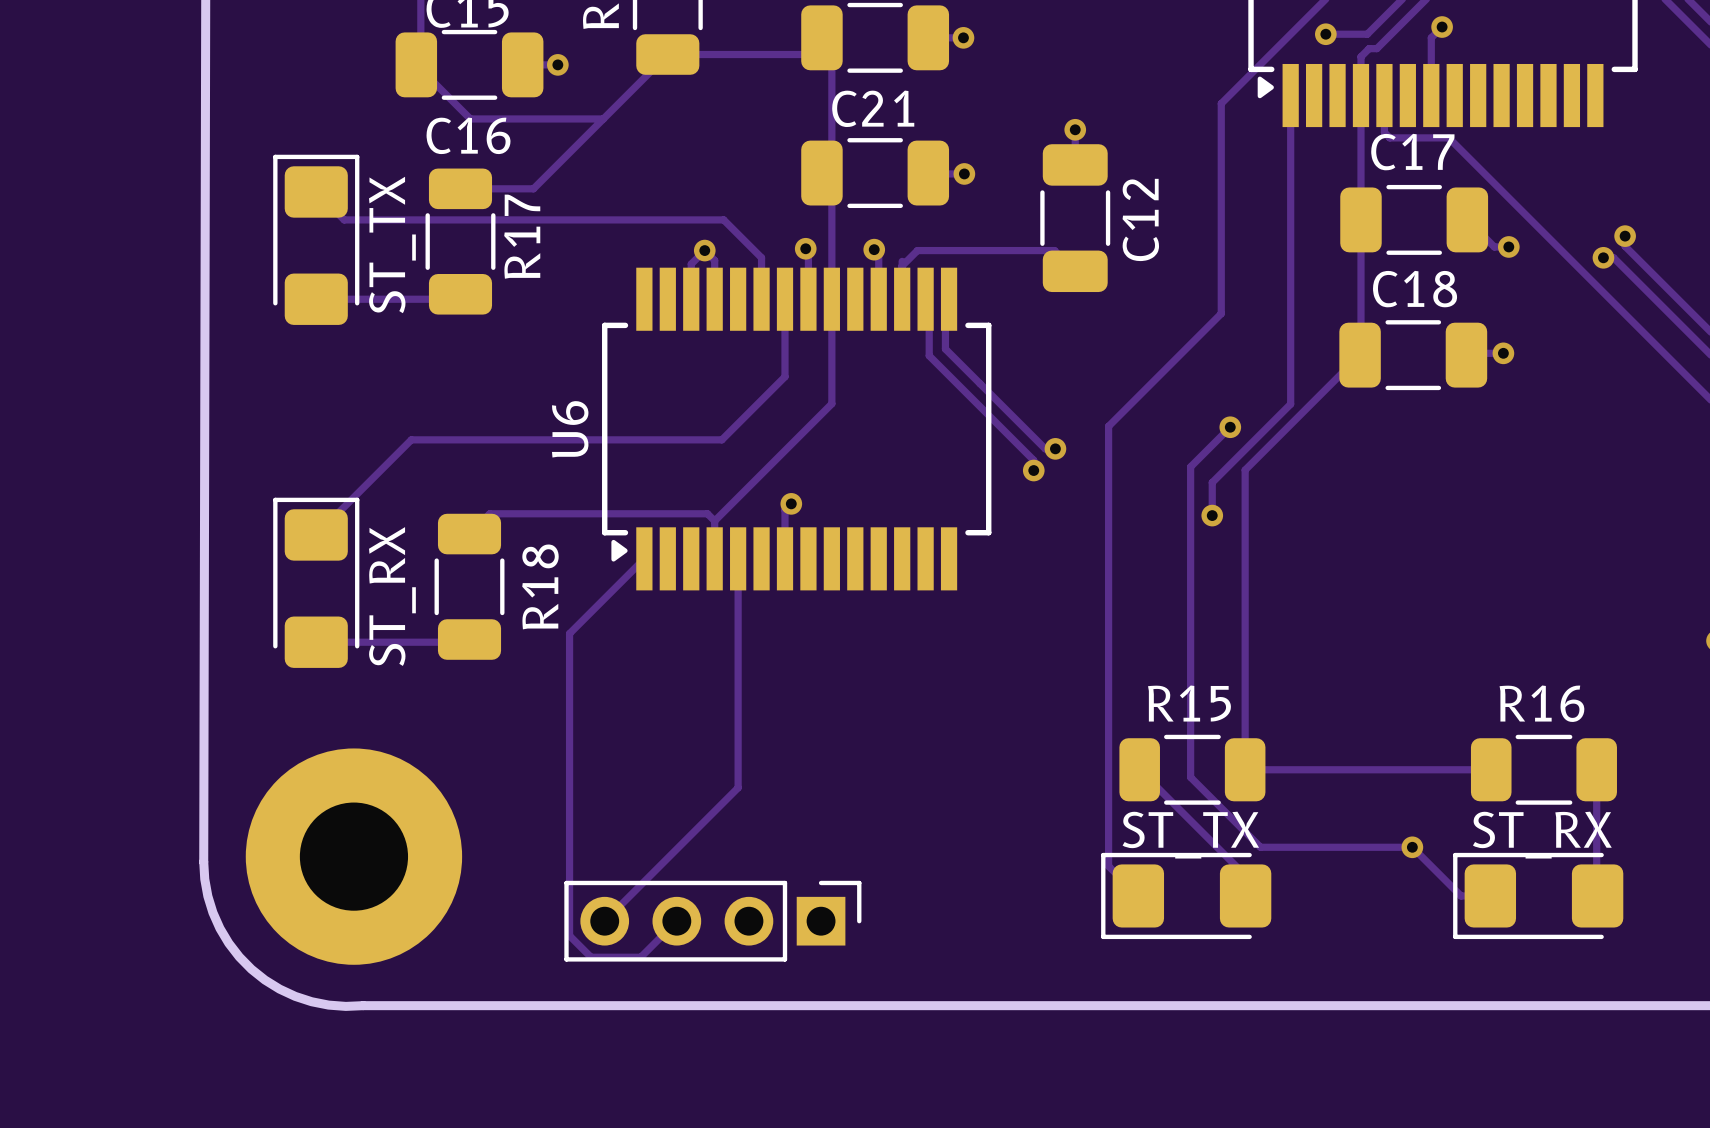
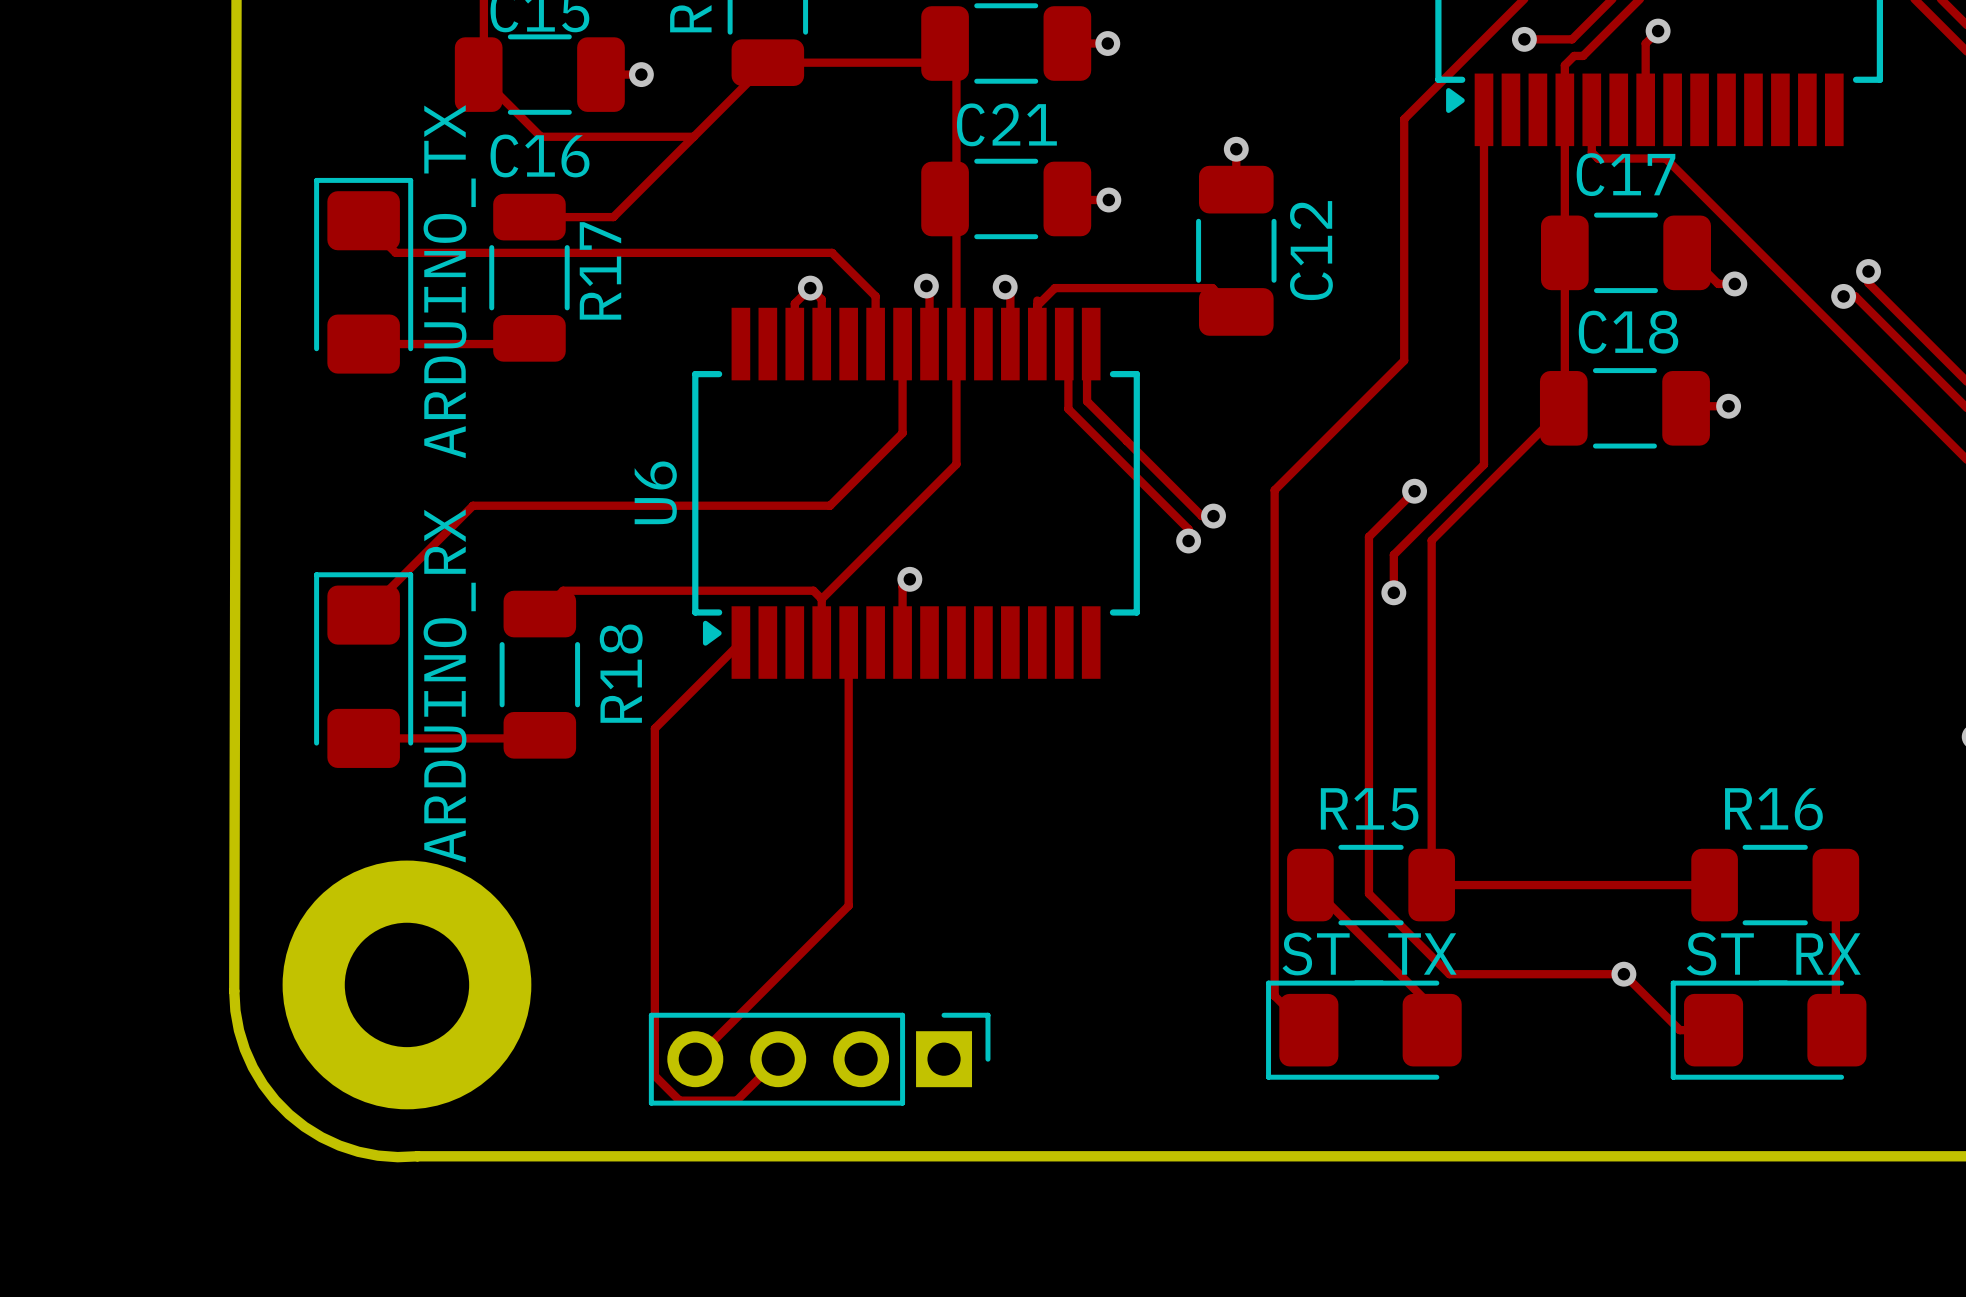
part value: ST_TX (392, 244) -> ARDUINO_TX (449, 281)
part value: ST_RX (392, 596) -> ARDUINO_RX (449, 685)

